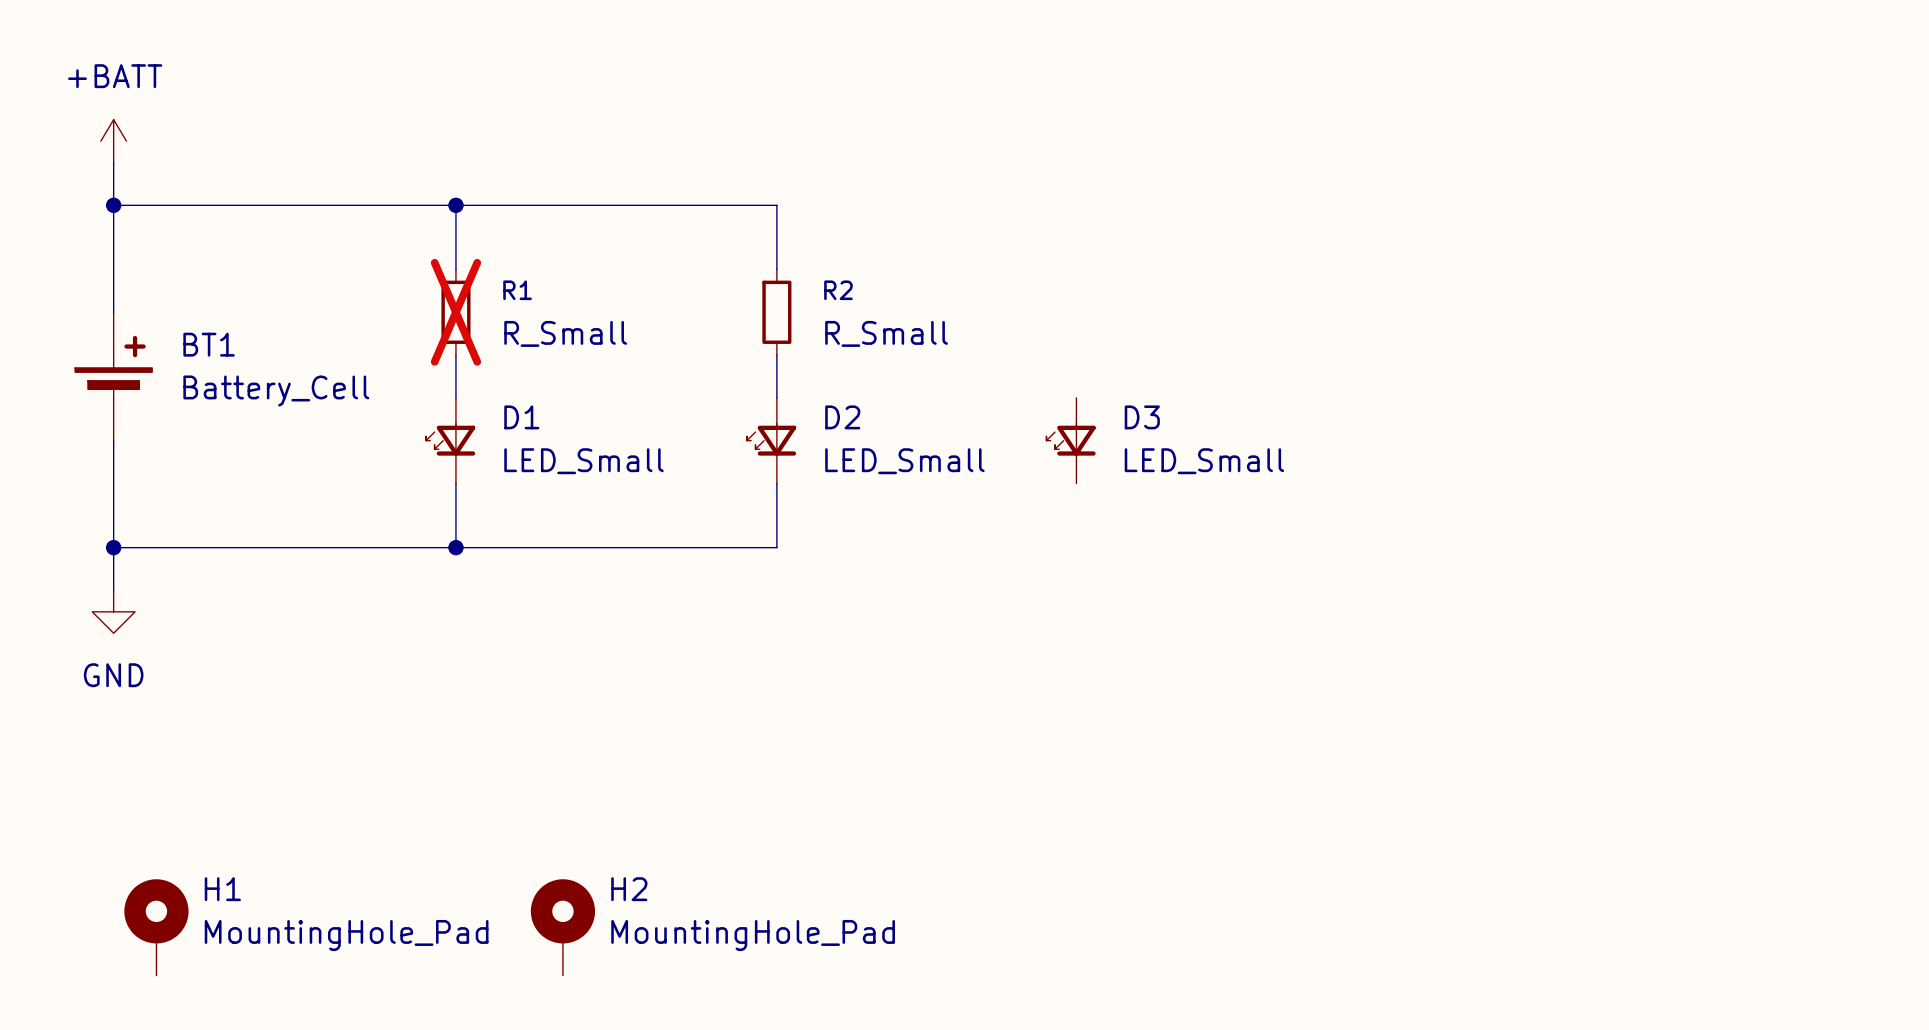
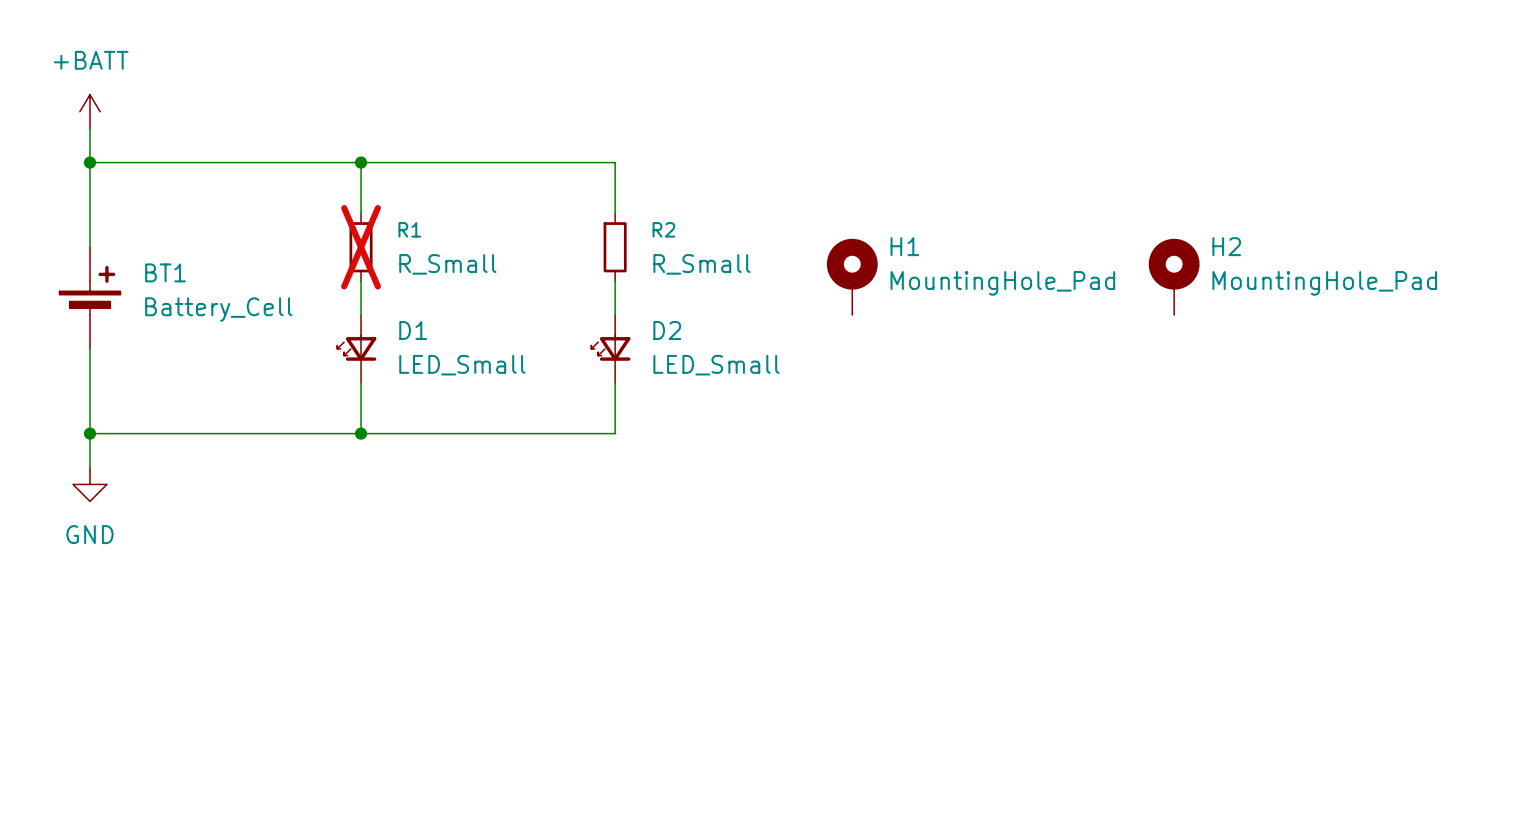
D3: LED_Small (1071, 440) -> none
H1 position: (156, 927) -> (852, 276)
H2 position: (562, 927) -> (1174, 276)

